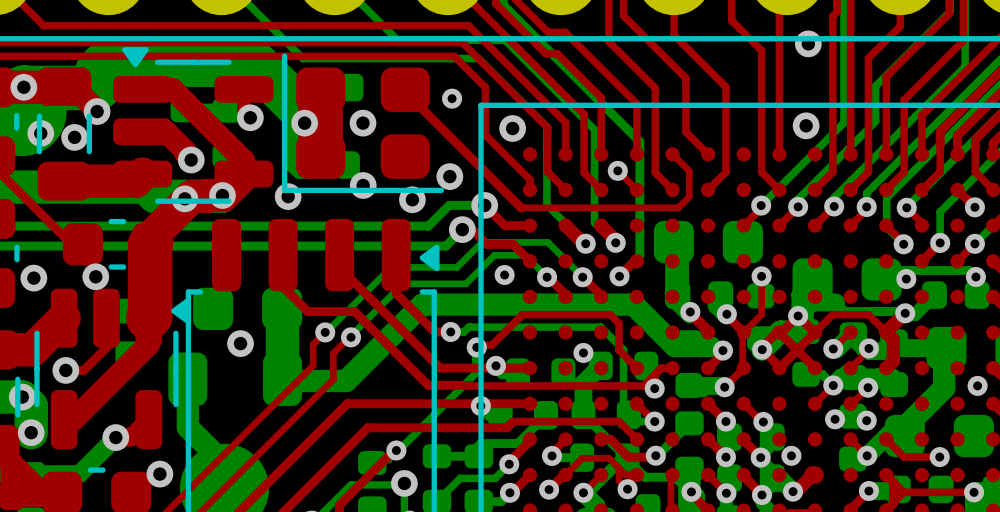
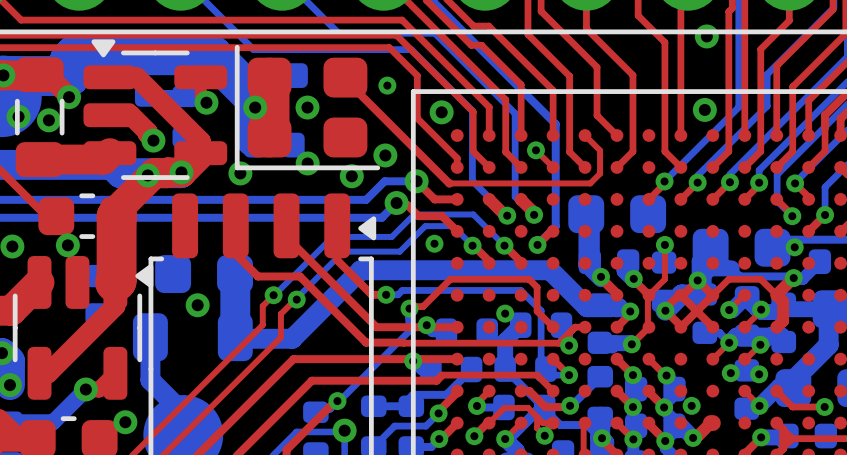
top track: (106, 318) (106, 347) (83, 370) (65, 370) -> none
via: (65, 370) -> none

